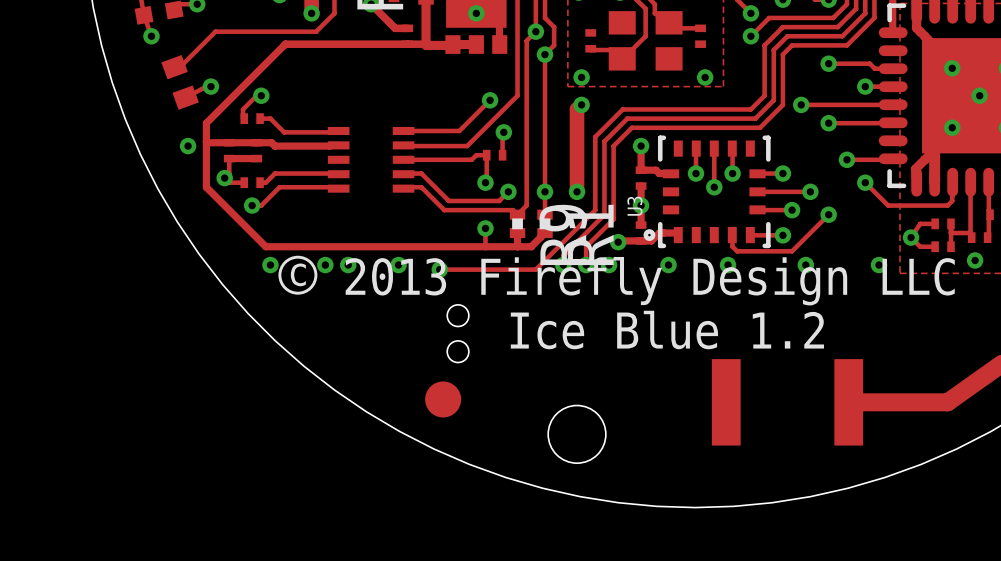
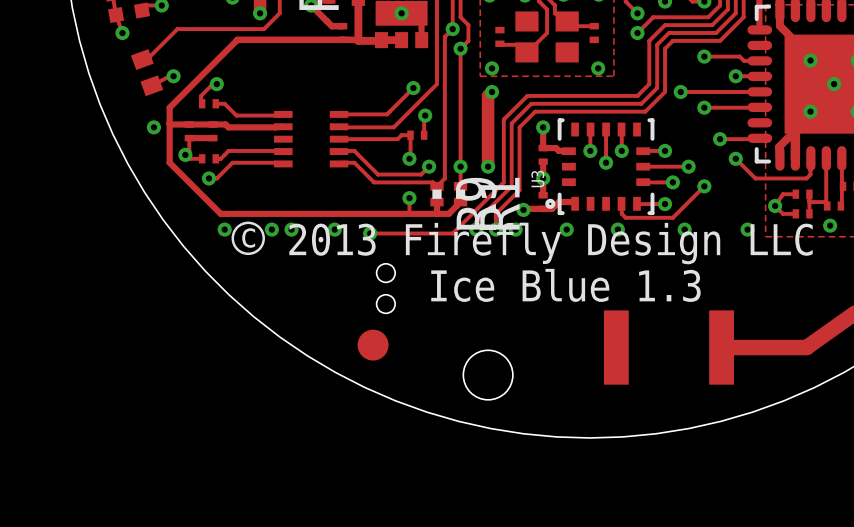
text: Ice Blue 1.2 (667, 330) -> Ice Blue 1.3 (565, 285)

